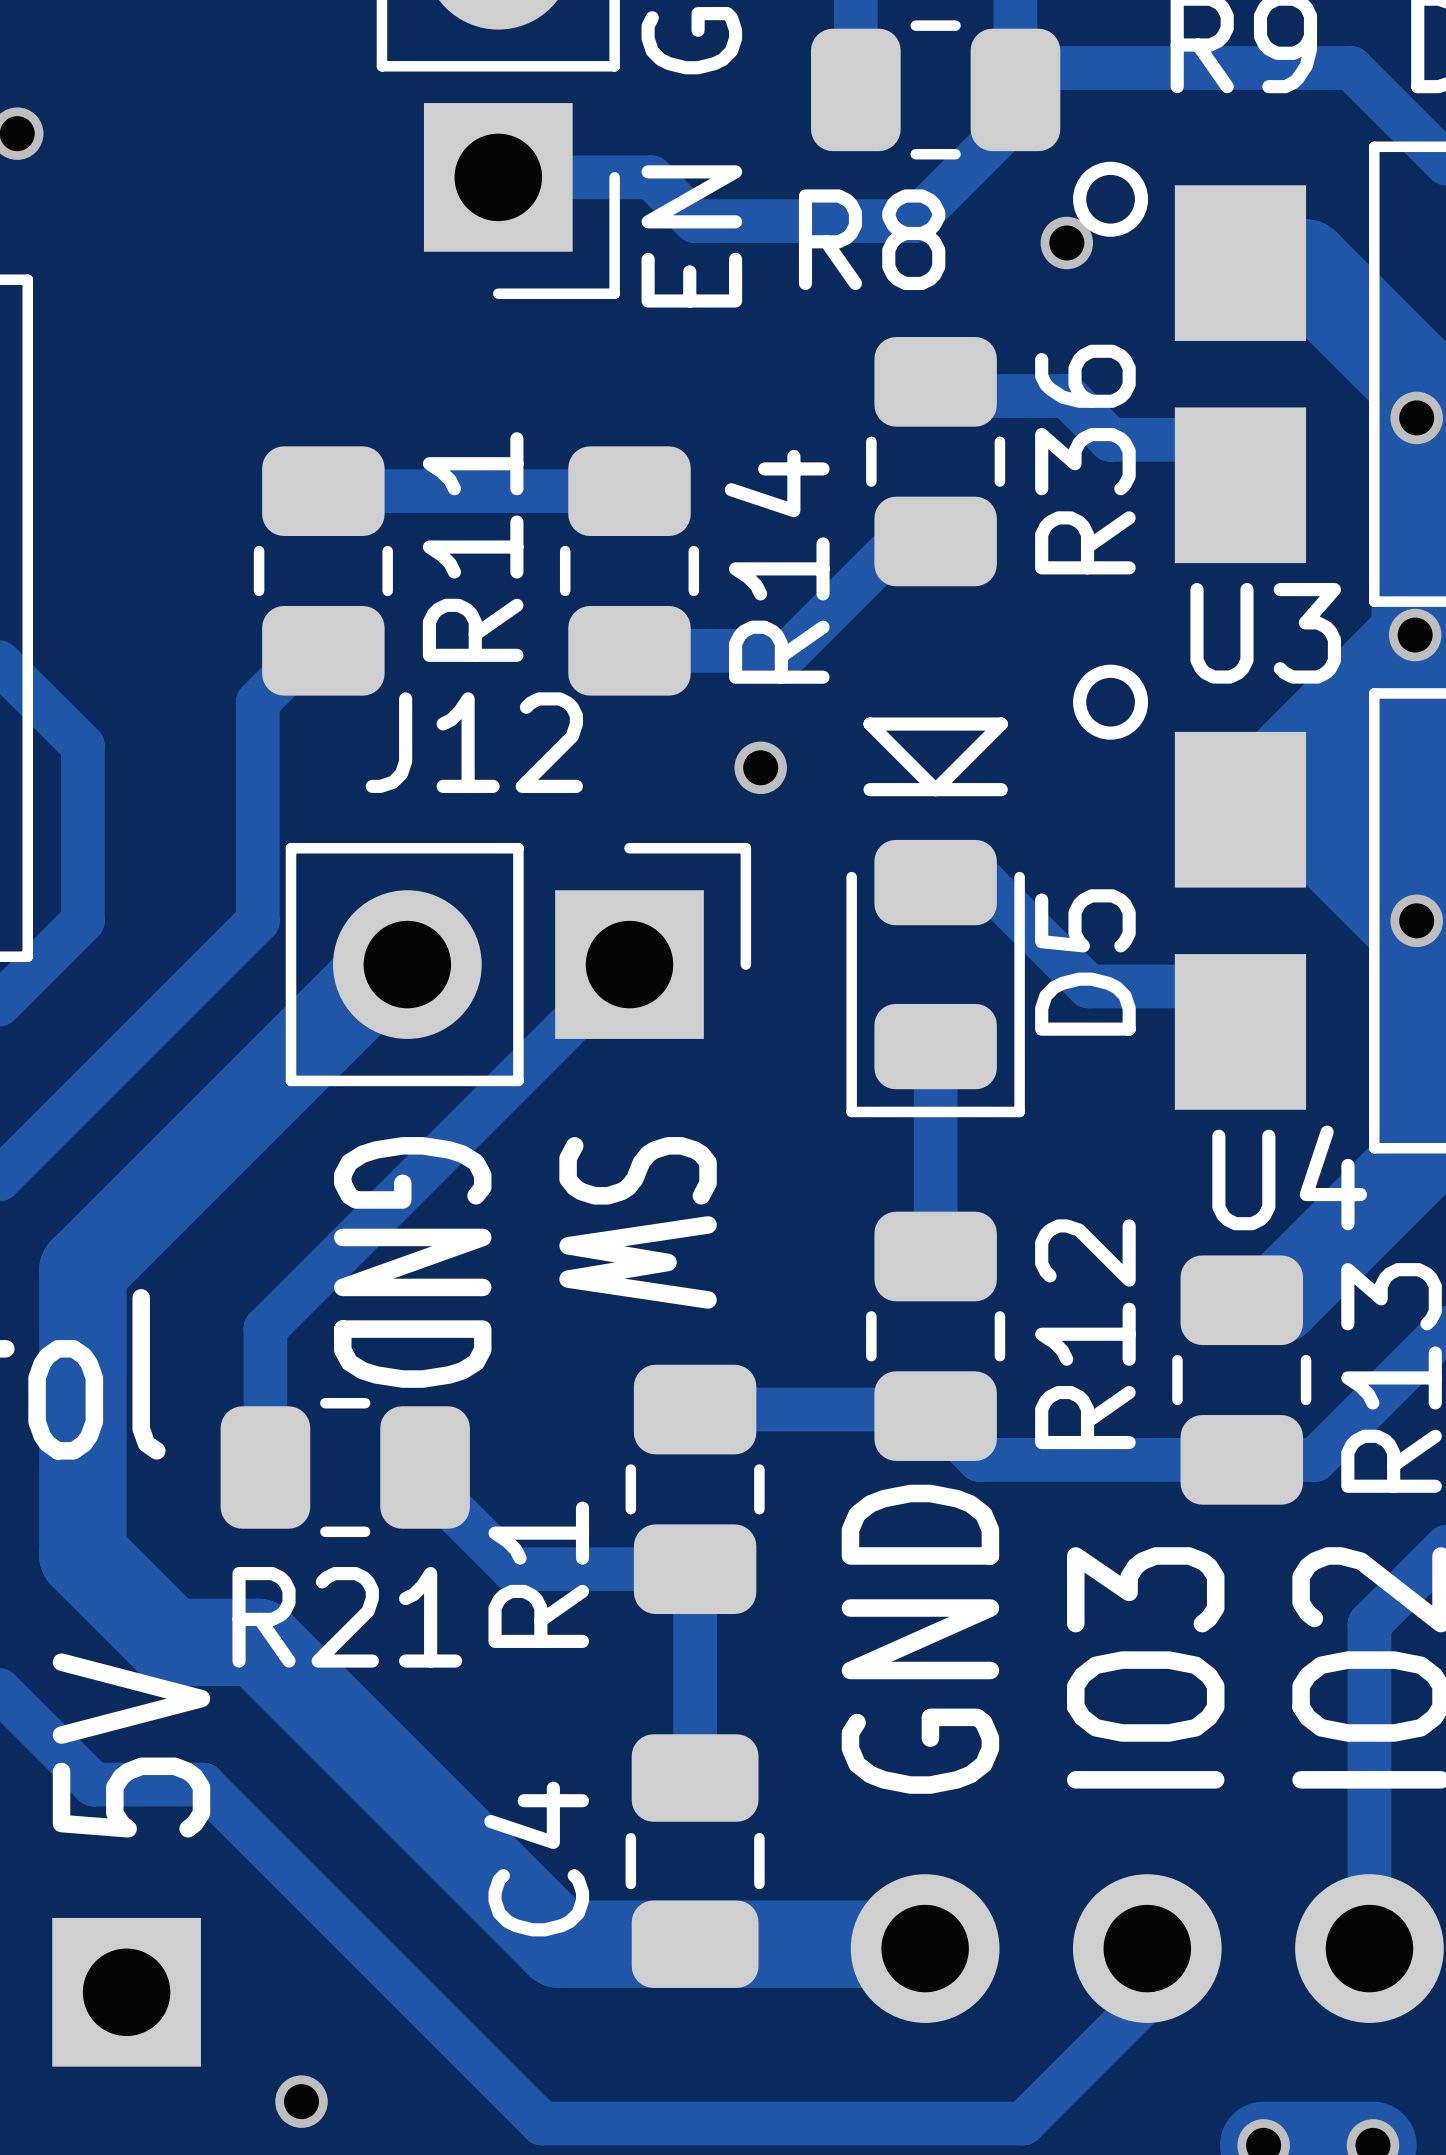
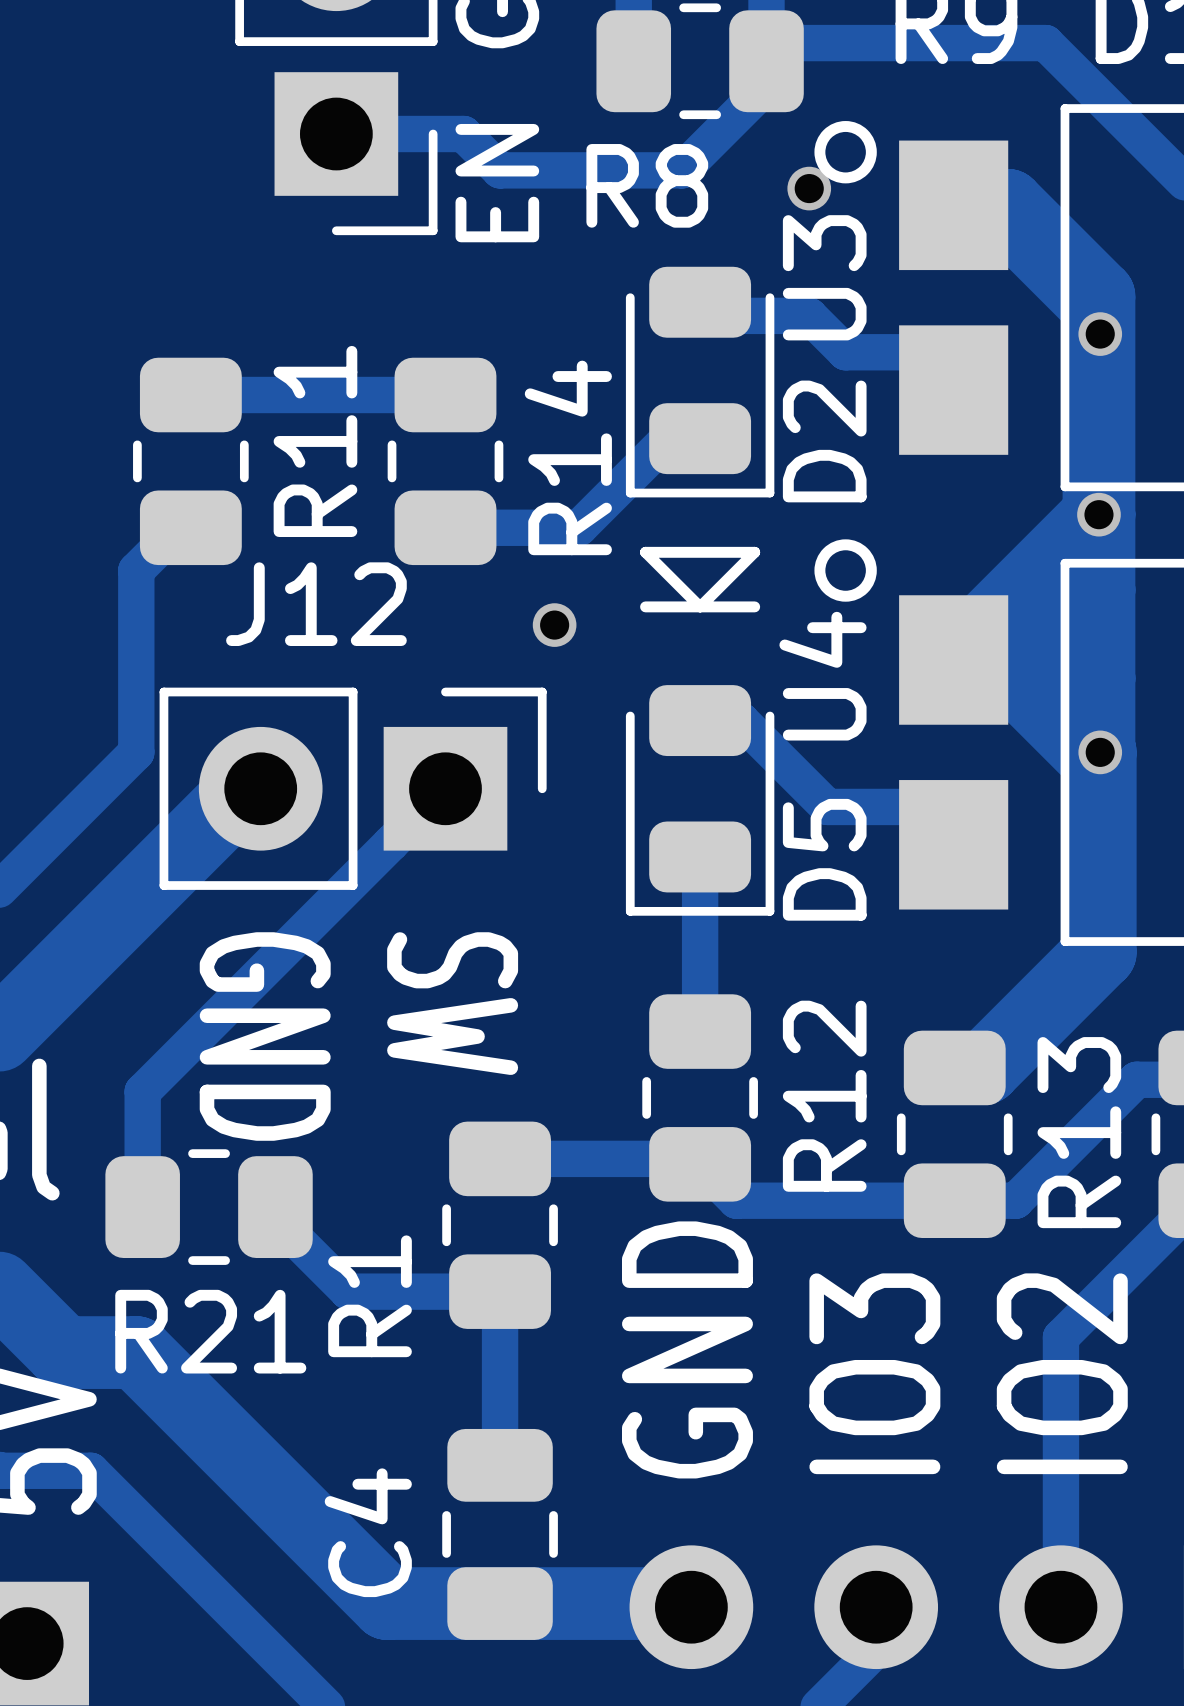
R36: (935, 461) -> none
D2: none -> (700, 382)
U3 name rotation: 0° (1265, 633) -> 90° counterclockwise (824, 277)
U3 name position: U3 (1265, 633) -> U3 (824, 277)
line: (870, 724) (935, 789) (1001, 724) (870, 724) -> (645, 552) (700, 606) (754, 552) (645, 552)
line: (870, 789) (1001, 789) -> (645, 606) (754, 606)
D5 name position: D5 (1085, 962) -> D5 (824, 859)
U4 name rotation: 0° (1289, 1177) -> 90° counterclockwise (822, 676)
U4 name position: U4 (1289, 1177) -> U4 (822, 676)

